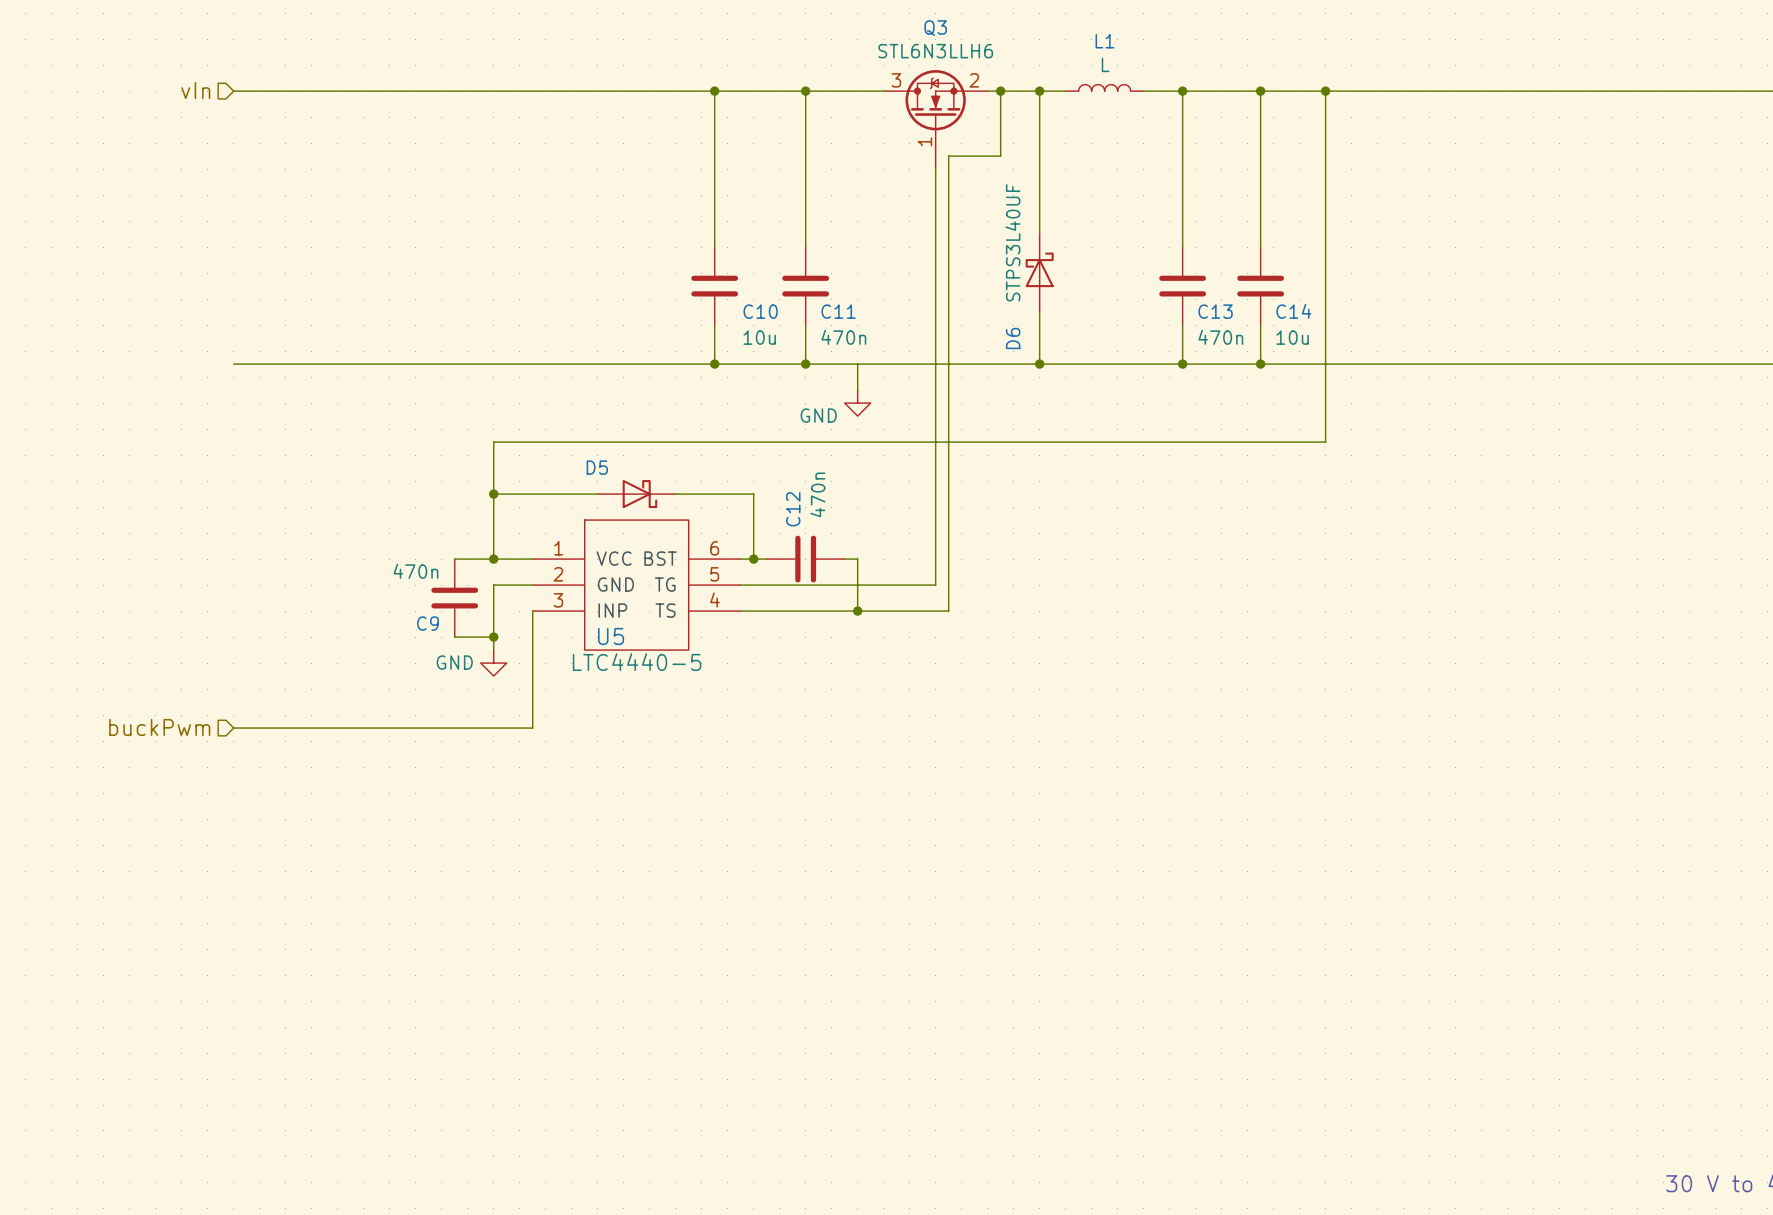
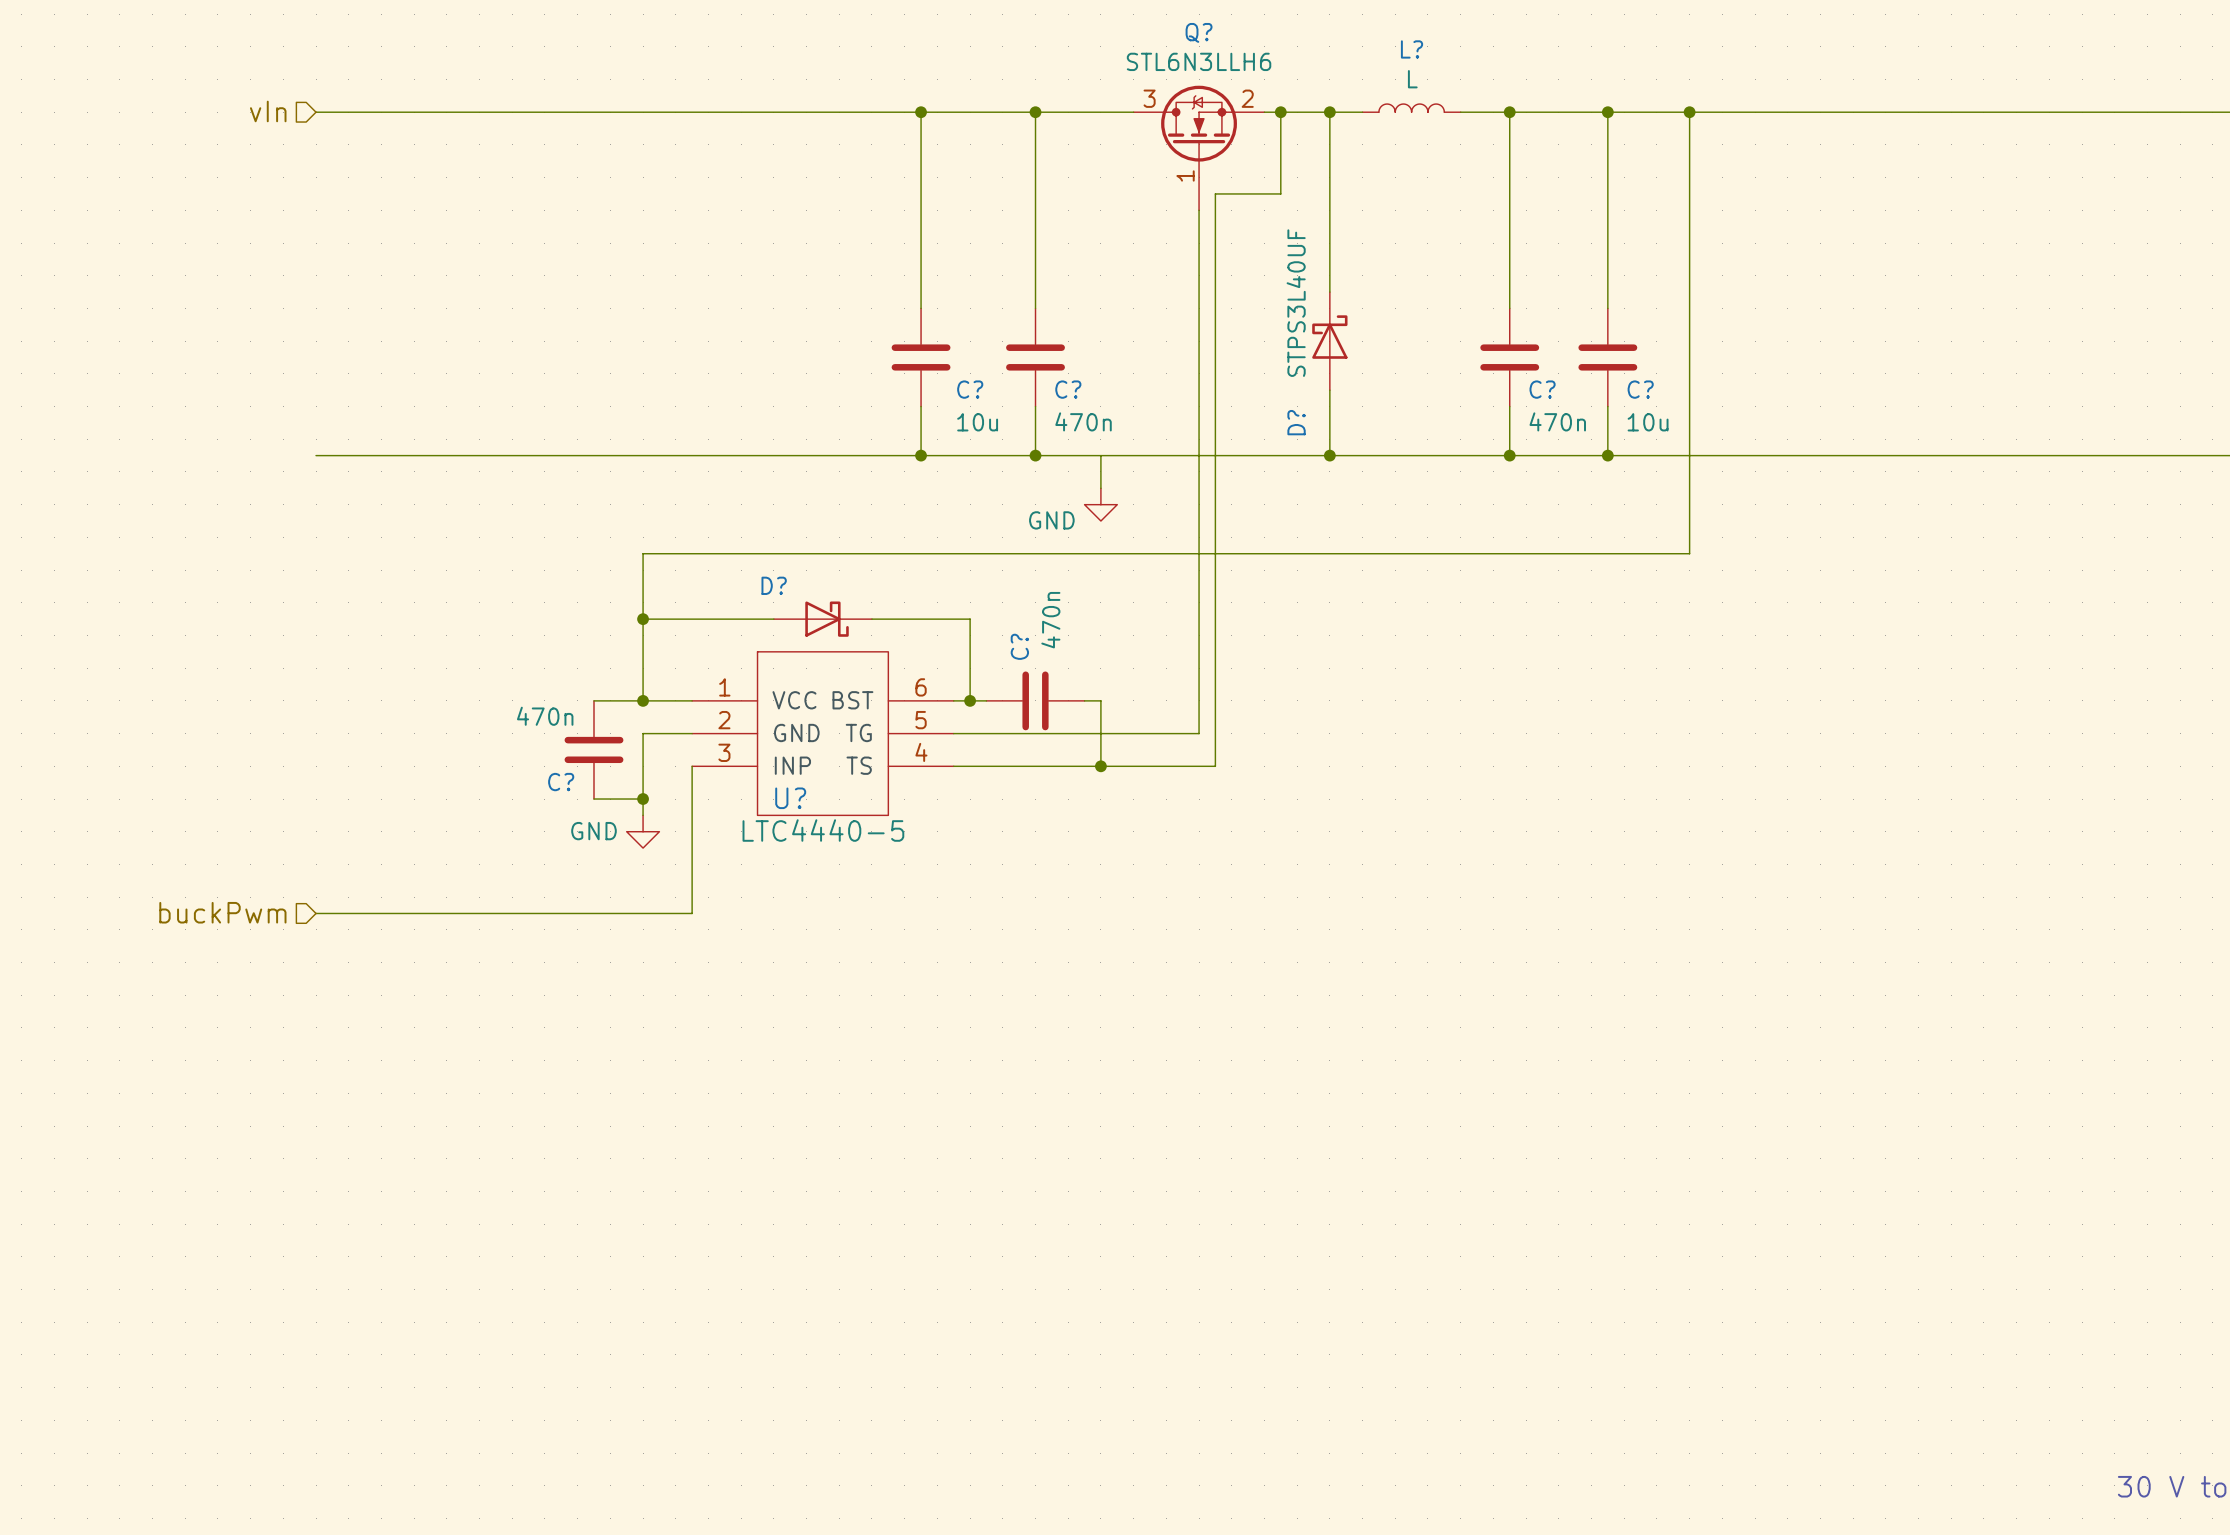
Q3 name: Q3 (935, 28) -> Q? (1199, 32)
L1 name: L1 (1104, 41) -> L? (1412, 49)
C10 name: C10 (760, 311) -> C? (970, 389)
C11 name: C11 (838, 311) -> C? (1068, 389)
C13 name: C13 (1215, 311) -> C? (1542, 389)
C14 name: C14 (1293, 311) -> C? (1640, 389)
D6 name: D6 (1013, 338) -> D? (1296, 422)
D5 name: D5 (597, 467) -> D? (774, 585)
C12 name: C12 (793, 509) -> C? (1019, 646)
C9 name: C9 (428, 623) -> C? (561, 782)
U5 name: U5 (611, 636) -> U? (790, 798)

